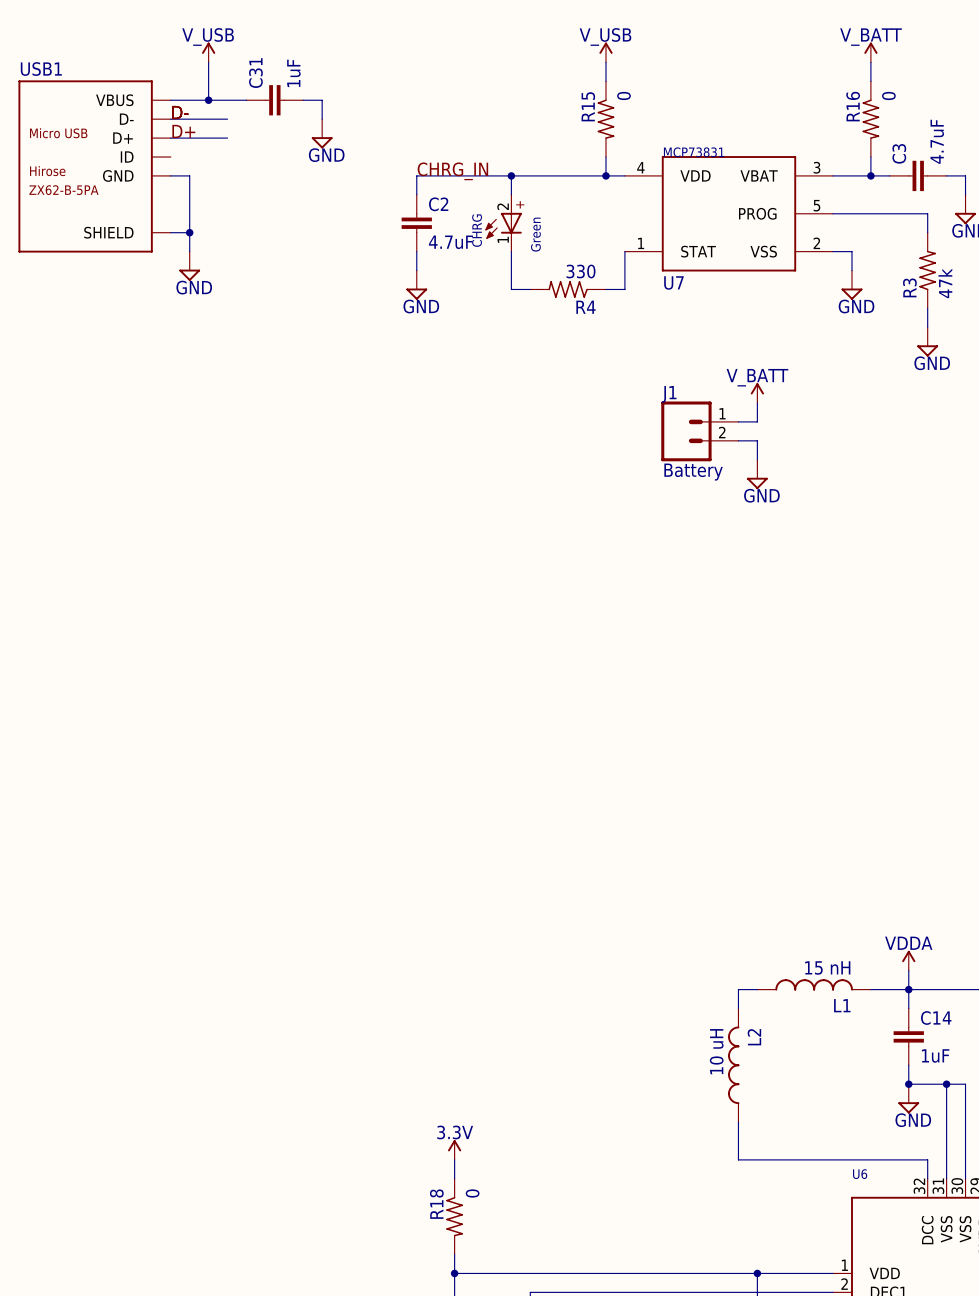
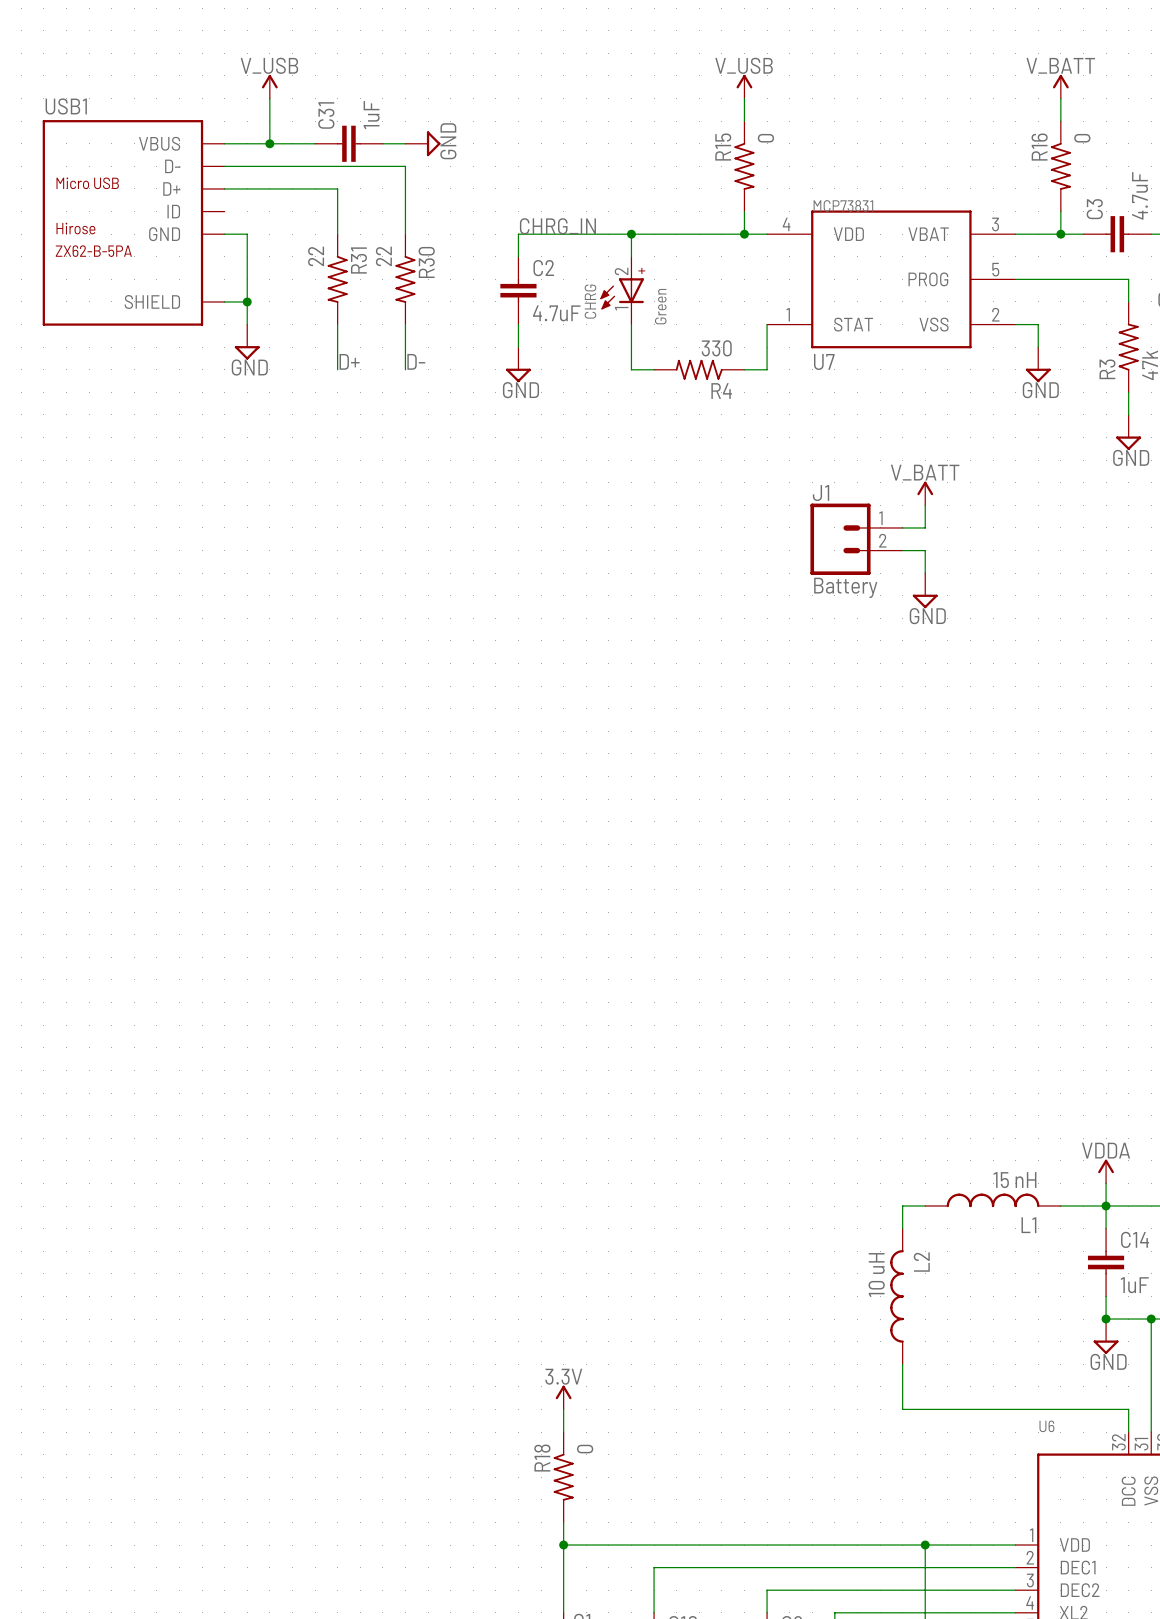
wire: (322, 100) (322, 119) -> none
label: D- (180, 112) -> none
wire: none -> (292, 166) (405, 166) (405, 234)
label position: D+ (183, 131) -> D+ (349, 361)
power symbol position: GND (322, 133) -> GND (422, 143)
wire: none -> (292, 188) (337, 188) (337, 234)
power symbol rotation: 0° (322, 142) -> 90° counterclockwise (433, 143)
R31: none -> 22 (337, 279)
R30: none -> 22 (405, 279)
wire: none -> (337, 324) (337, 369)
wire: none -> (405, 324) (405, 369)
label: none -> D- (416, 361)

